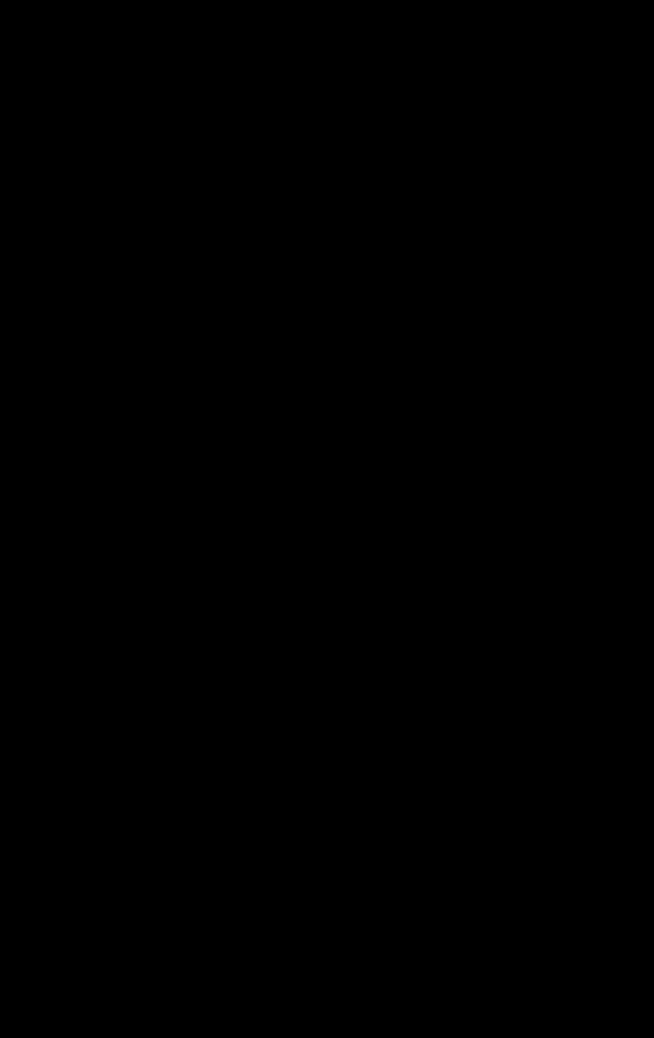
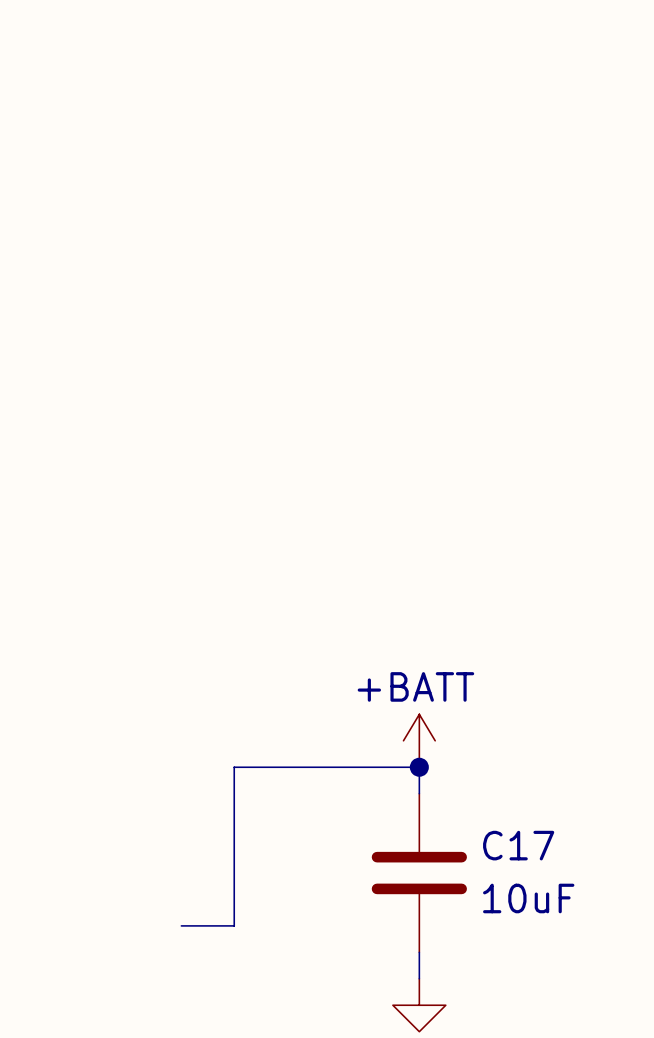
power symbol: none -> +BATT (419, 740)
junction: none -> (419, 767)
wire: none -> (419, 793) (419, 767) (234, 767) (234, 925) (181, 925)
C17: none -> 10uF (419, 873)
wire: none -> (419, 952) (419, 978)
power symbol: none -> (419, 1005)

